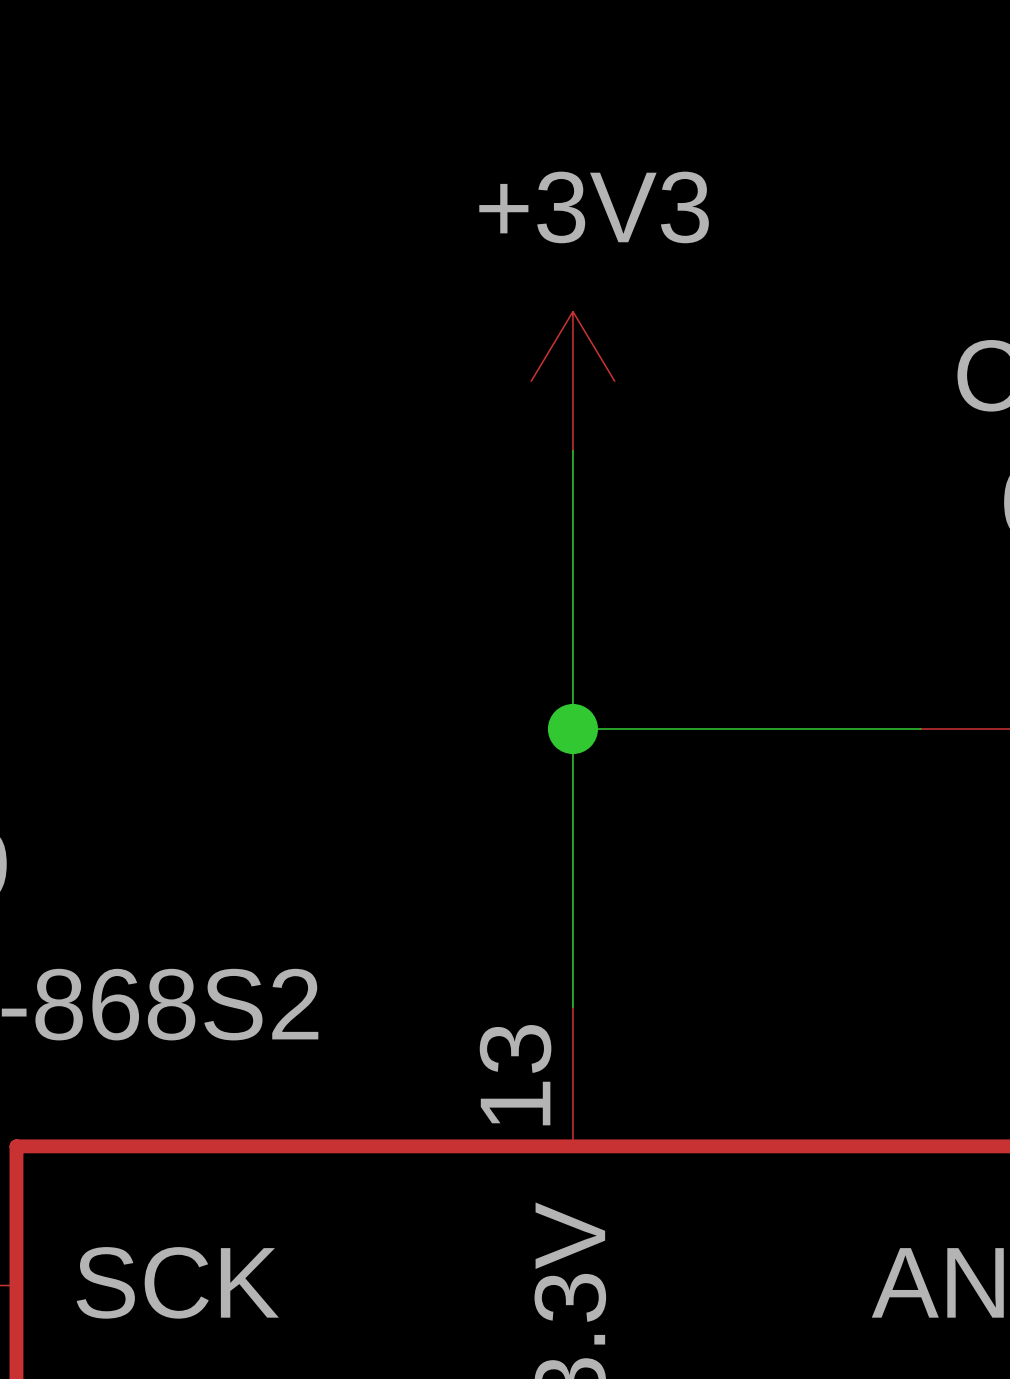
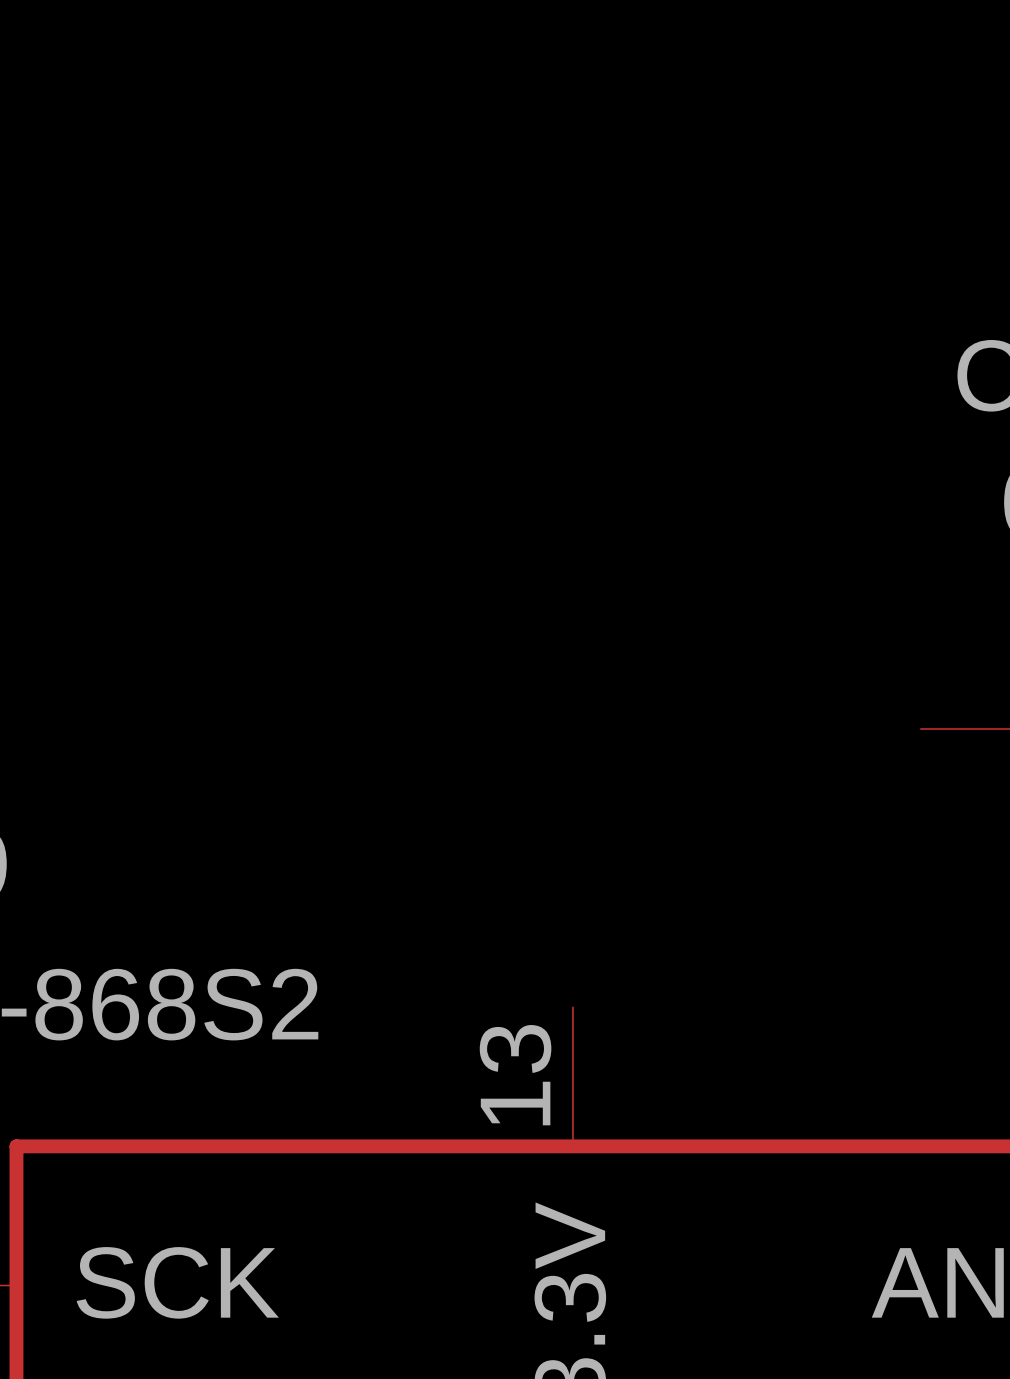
power symbol: +3V3 (572, 381) -> none
wire: (572, 450) (572, 1007) -> none
wire: (572, 729) (920, 729) -> none
junction: (572, 729) -> none

